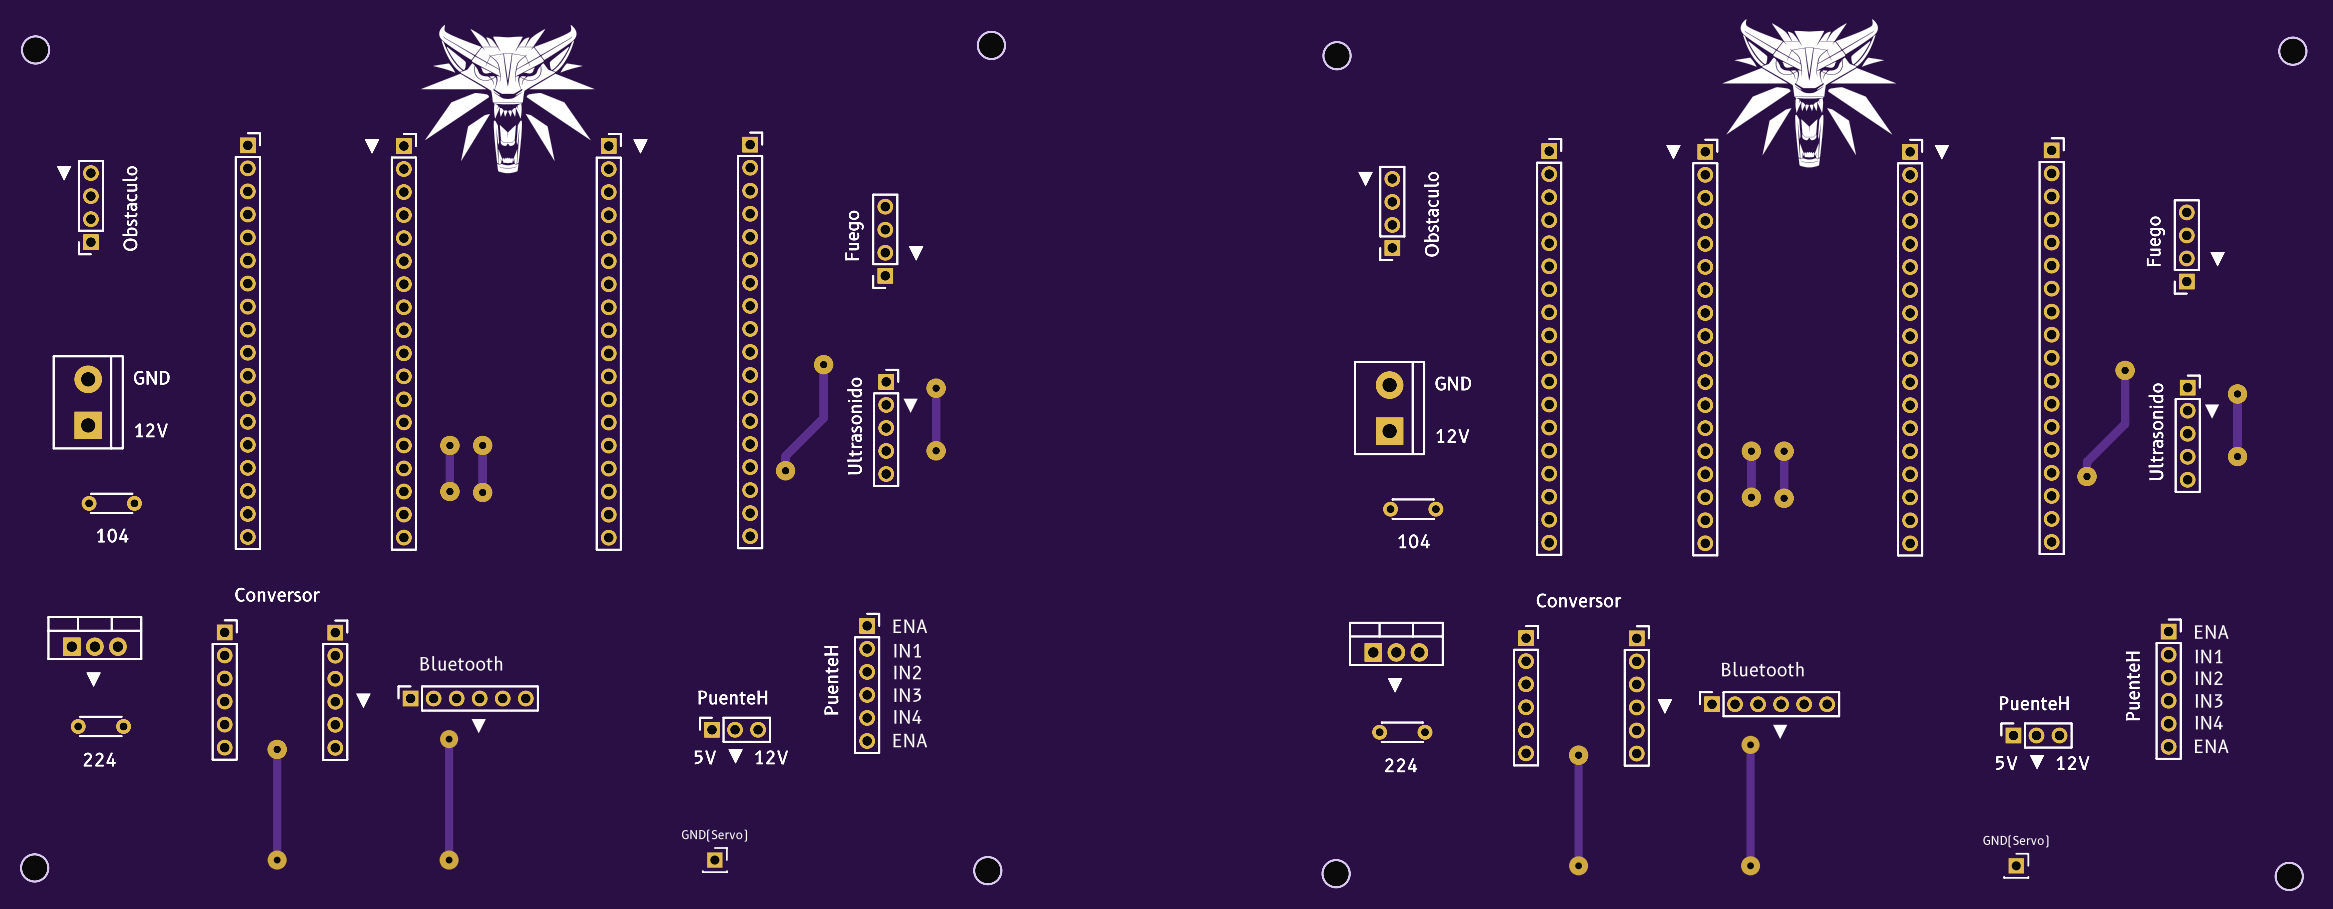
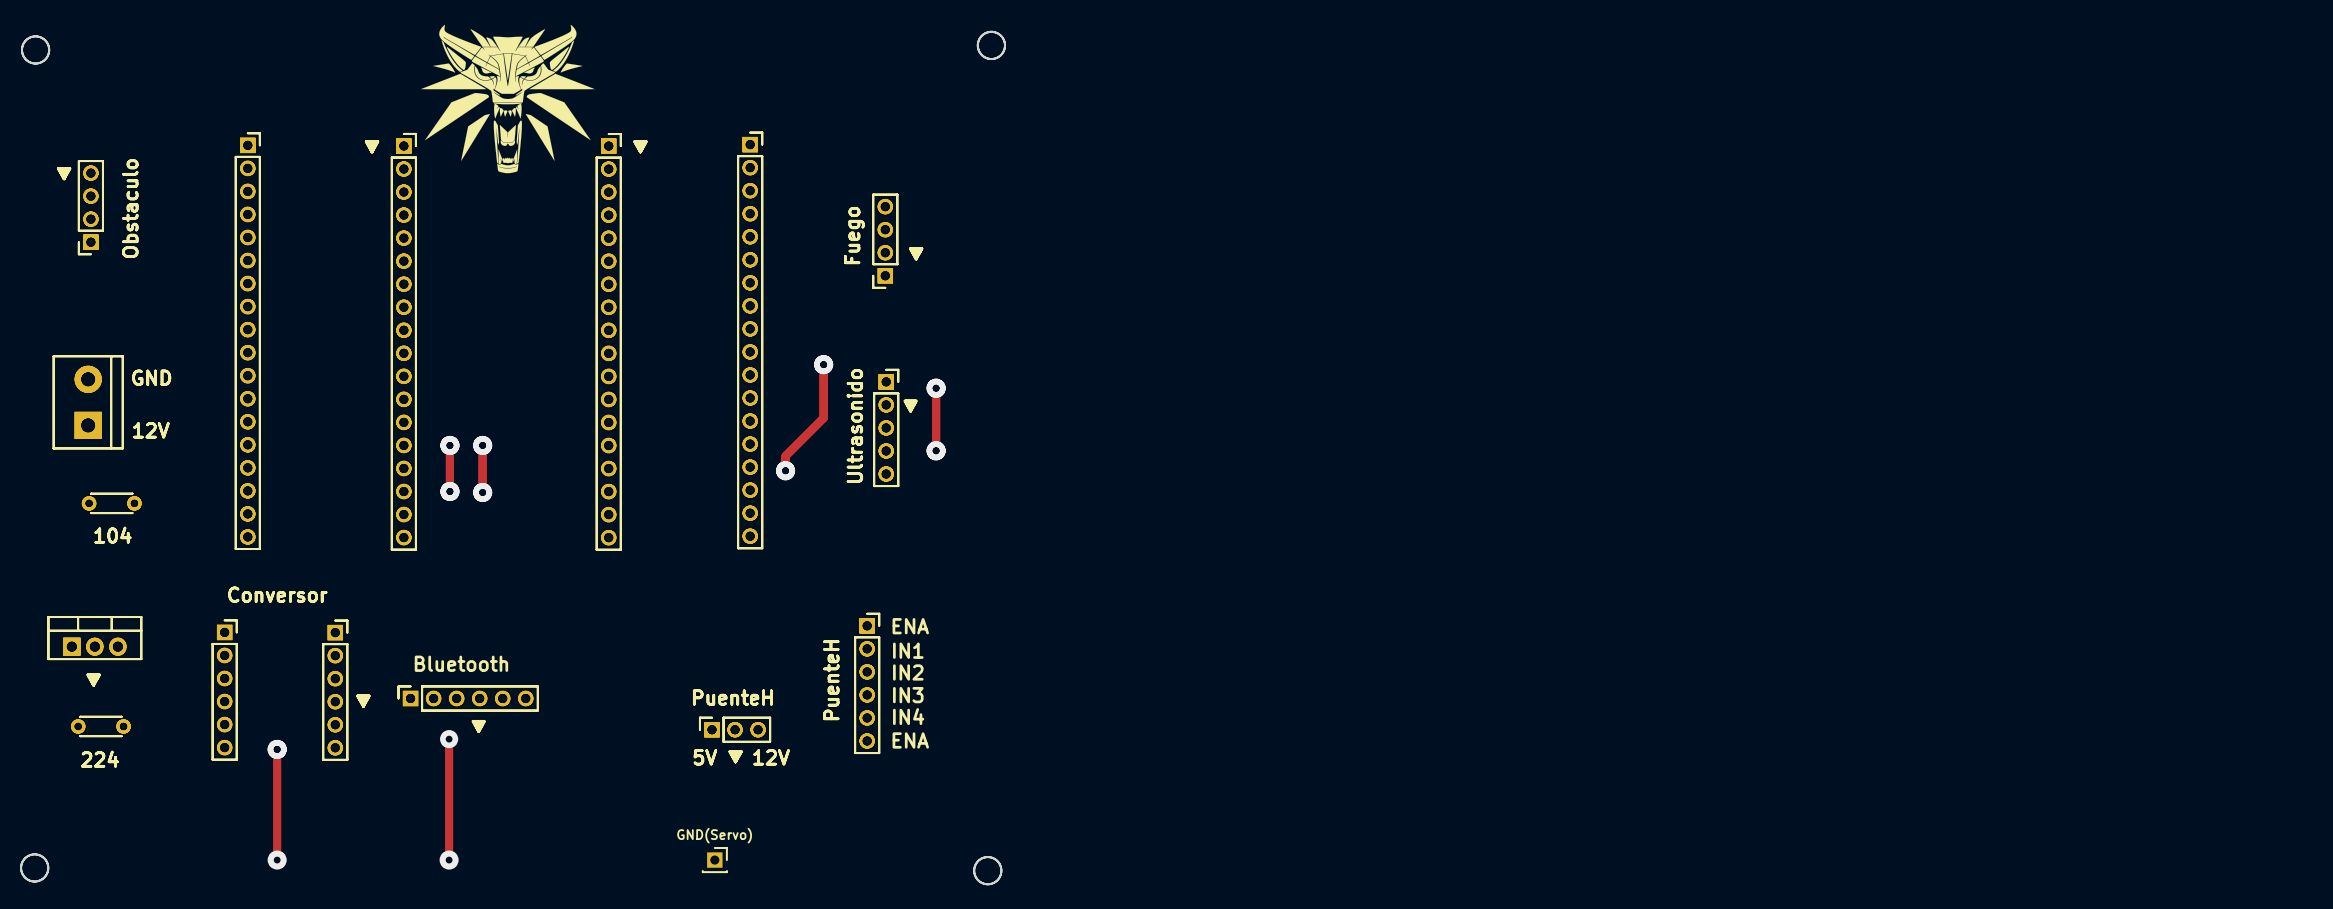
drawing: [1722, 19, 1897, 168] -> none
part: (2292, 51) -> none
part: (1337, 55) -> none
text: ▲ (1673, 152) -> none
text: ▲ (1941, 152) -> none
text: ▲ (1365, 179) -> none
part: (1392, 213) -> none
part: (1392, 213) -> none
text: Obstaculo (1431, 214) -> none
text: Fuego (2156, 241) -> none
part: (2186, 246) -> none
part: (2186, 246) -> none
text: ▲ (2217, 259) -> none
part: (1549, 346) -> none
part: (1549, 346) -> none
part: (2051, 346) -> none
part: (2051, 346) -> none
part: (1705, 347) -> none
part: (1705, 347) -> none
part: (1910, 347) -> none
part: (1910, 347) -> none
track: (2125, 370) (2125, 423) (2087, 461) (2087, 476) -> none
via: (2125, 370) -> none
text: GND (1453, 383) -> none
track: (2237, 393) (2237, 456) -> none
via: (2237, 393) -> none
part: (1389, 408) -> none
part: (1389, 408) -> none
text: ▲ (2212, 411) -> none
text: Ultrasonido (2155, 431) -> none
part: (2187, 433) -> none
part: (2187, 433) -> none
text: 12V (1452, 436) -> none
track: (1784, 449) (1784, 498) -> none
track: (1751, 451) (1751, 497) -> none
via: (1751, 451) -> none
via: (1784, 451) -> none
via: (2237, 456) -> none
via: (2087, 476) -> none
via: (1751, 497) -> none
via: (1784, 498) -> none
part: (1413, 509) -> none
part: (1413, 509) -> none
text: 104 (1414, 541) -> none
text: Conversor (1579, 600) -> none
text: ENA (2211, 631) -> none
part: (1396, 643) -> none
part: (1396, 643) -> none
text: IN1 (2209, 656) -> none
text: Bluetooth (1762, 669) -> none
text: IN2 (2209, 678) -> none
text: ▲ (1395, 685) -> none
text: PuenteH (2132, 686) -> none
part: (2168, 689) -> none
part: (2168, 689) -> none
part: (1526, 695) -> none
part: (1526, 695) -> none
part: (1636, 695) -> none
part: (1636, 695) -> none
text: IN3 (2209, 700) -> none
text: PuenteH (2034, 703) -> none
part: (1769, 704) -> none
part: (1769, 704) -> none
text: ▲ (1664, 706) -> none
text: IN4 (2209, 722) -> none
text: ▲ (1780, 731) -> none
part: (1402, 732) -> none
part: (1402, 732) -> none
part: (2036, 735) -> none
part: (2036, 735) -> none
track: (1750, 743) (1750, 859) -> none
via: (1750, 744) -> none
text: ENA (2211, 746) -> none
track: (1578, 755) (1578, 860) -> none
via: (1578, 755) -> none
text: ▲ (2037, 762) -> none
text: 5V (2006, 763) -> none
text: 12V (2073, 763) -> none
text: 224 (1401, 765) -> none
via: (1578, 865) -> none
via: (1750, 865) -> none
GND(Servo): (2016, 865) -> none
part: (1336, 873) -> none
part: (2289, 876) -> none

